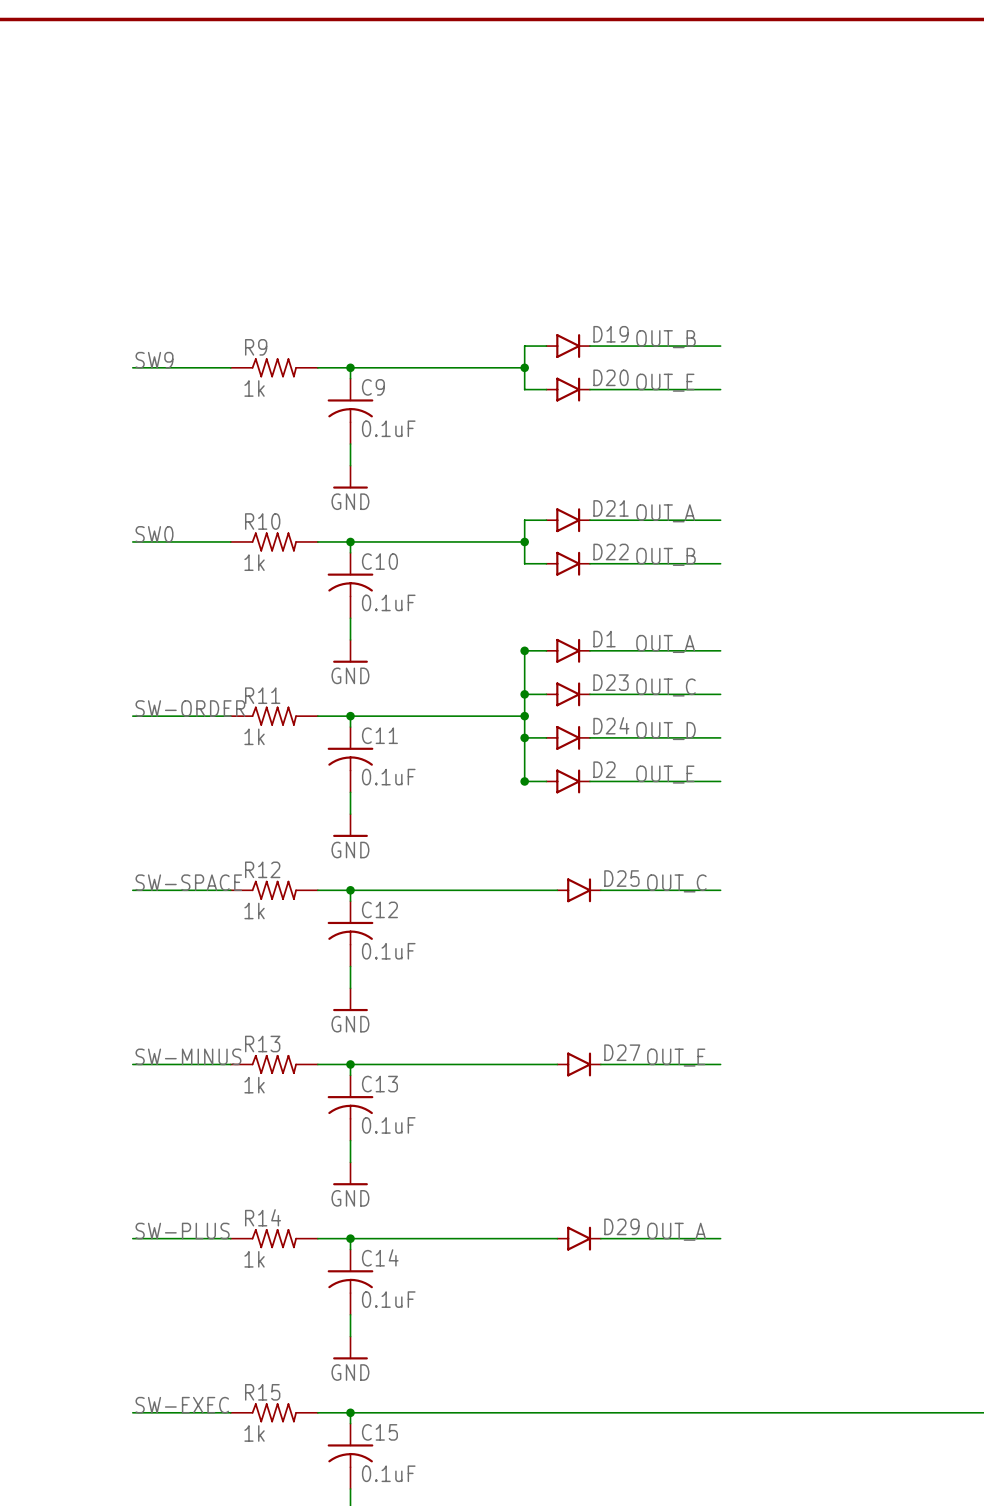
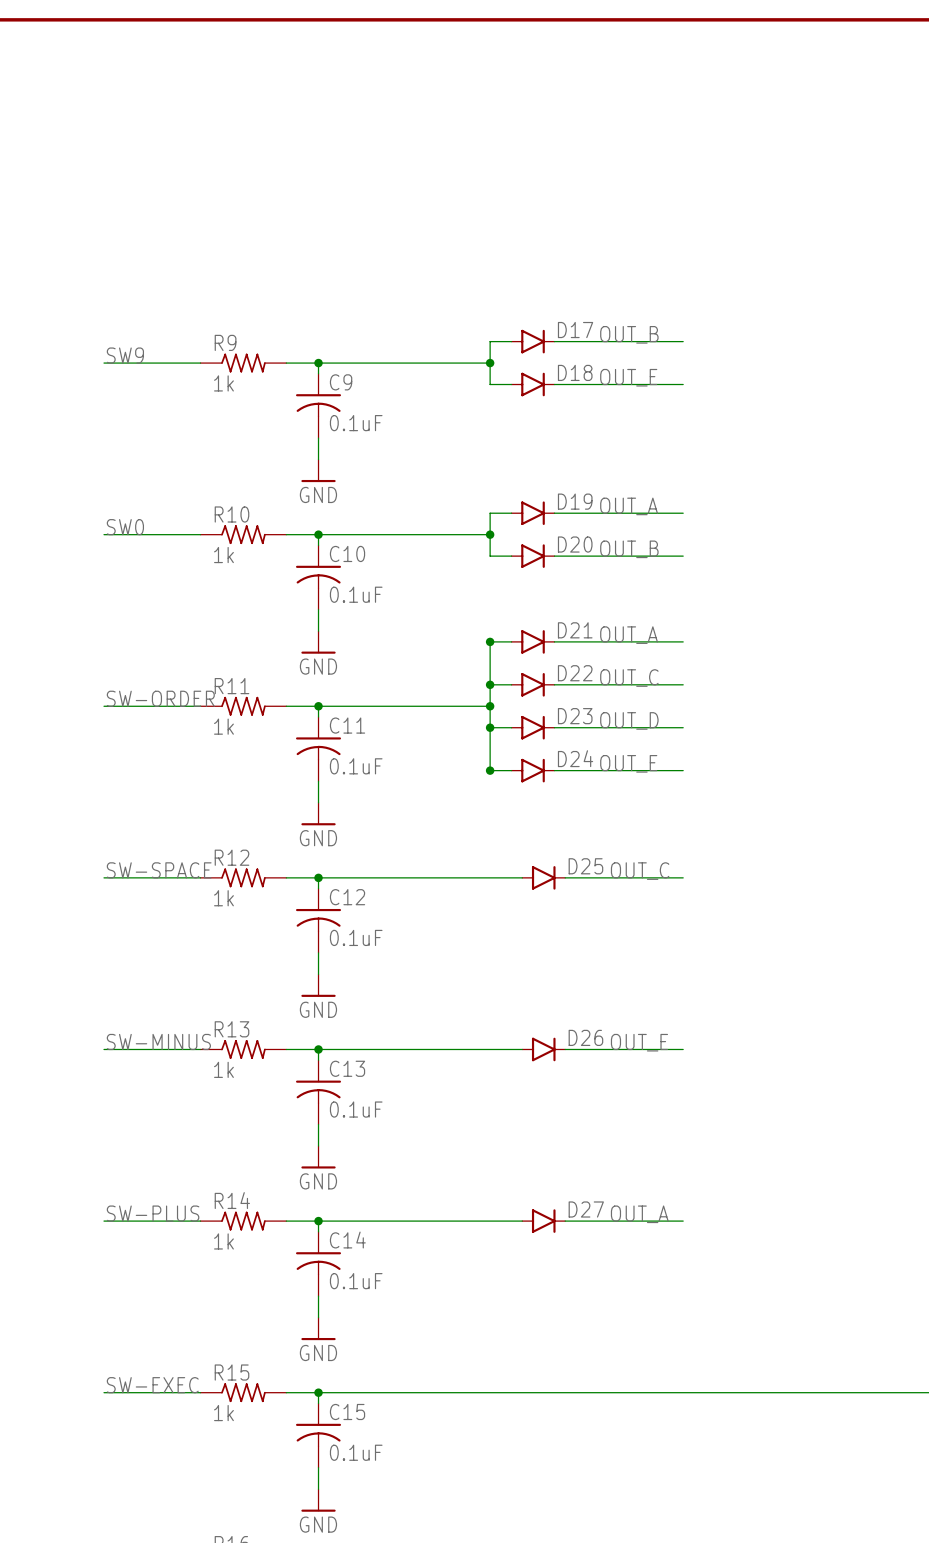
D19 name: D19 (611, 334) -> D17 (575, 330)
D20 name: D20 (611, 377) -> D18 (575, 372)
D21 name: D21 (611, 508) -> D19 (575, 501)
D22 name: D22 (611, 551) -> D20 (575, 544)
D1 name: D1 (604, 639) -> D21 (575, 630)
D23 name: D23 (611, 682) -> D22 (575, 673)
D24 name: D24 (611, 725) -> D23 (575, 716)
D2 name: D2 (604, 769) -> D24 (575, 758)
D27 name: D27 (622, 1052) -> D26 (585, 1037)
D29 name: D29 (621, 1226) -> D27 (586, 1209)

